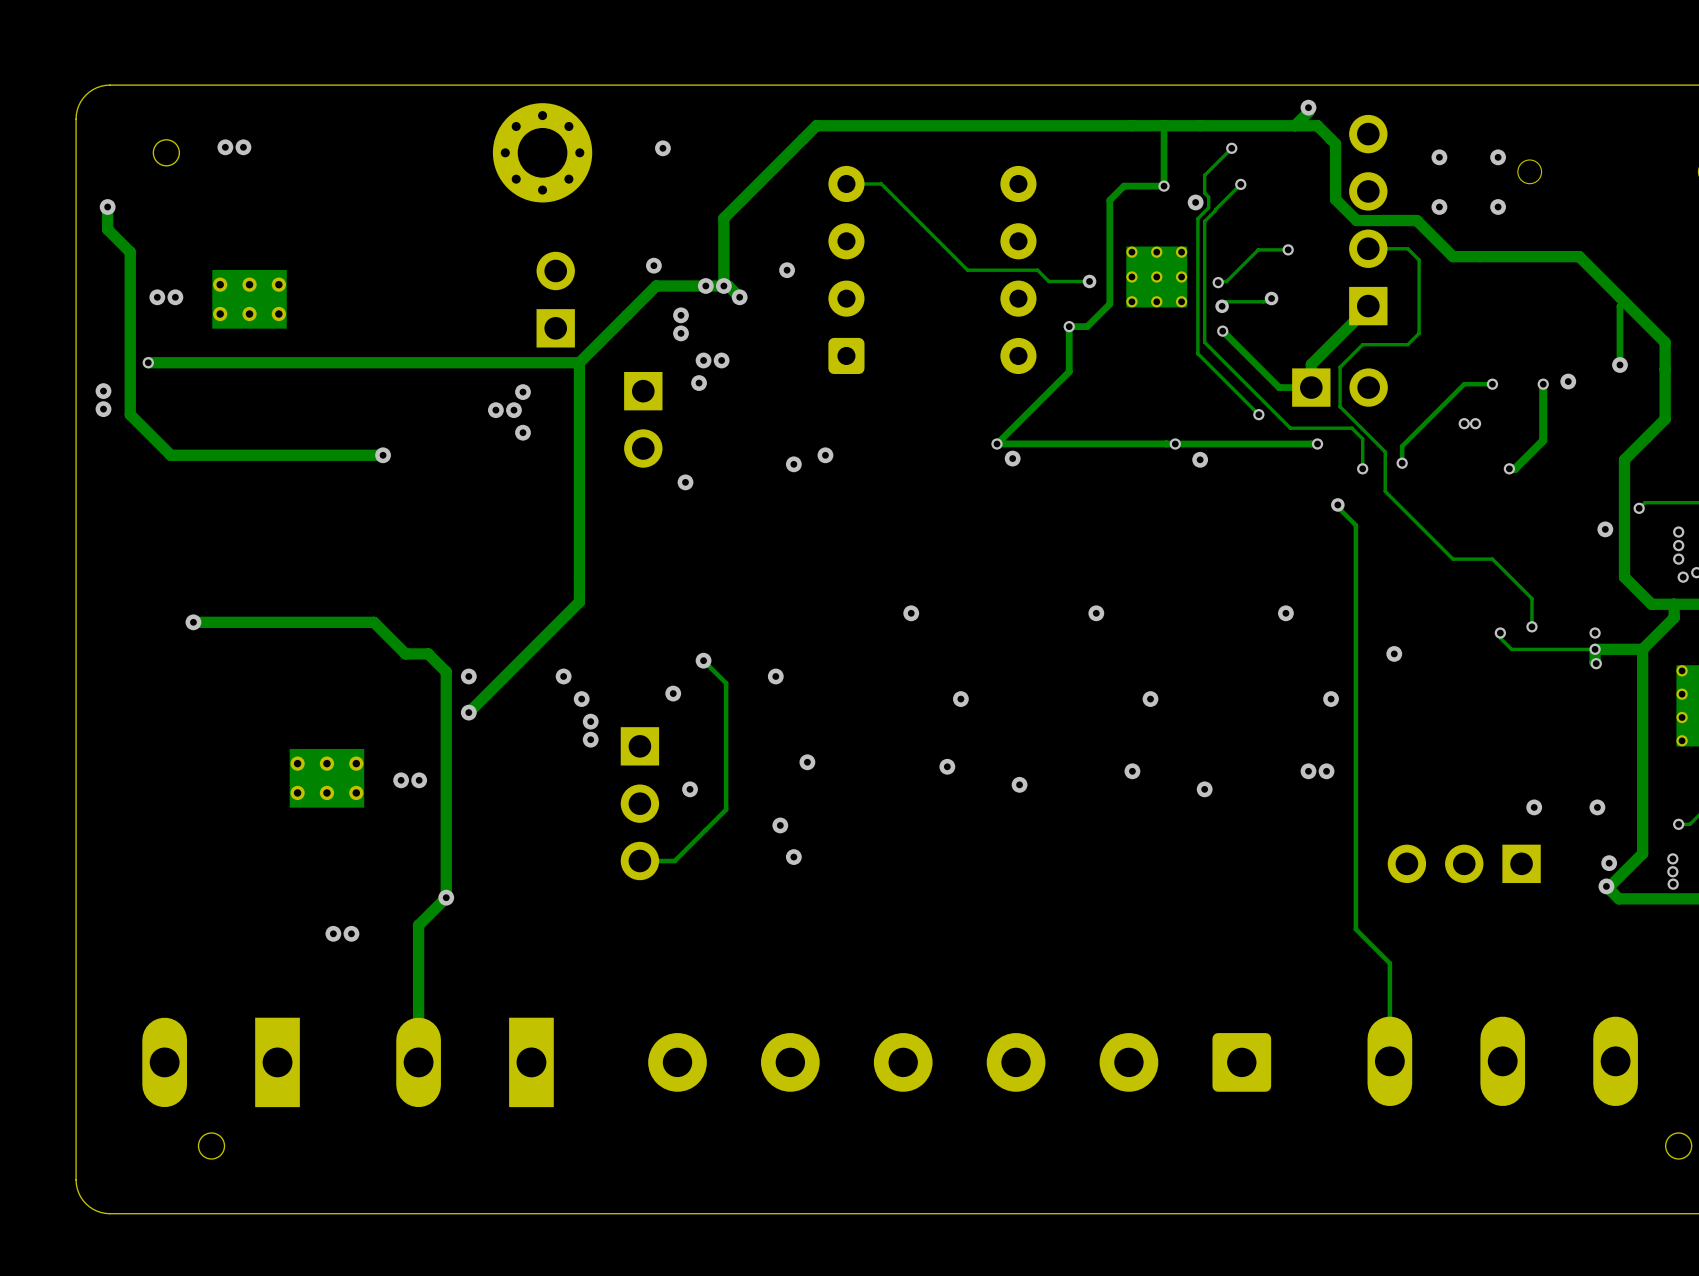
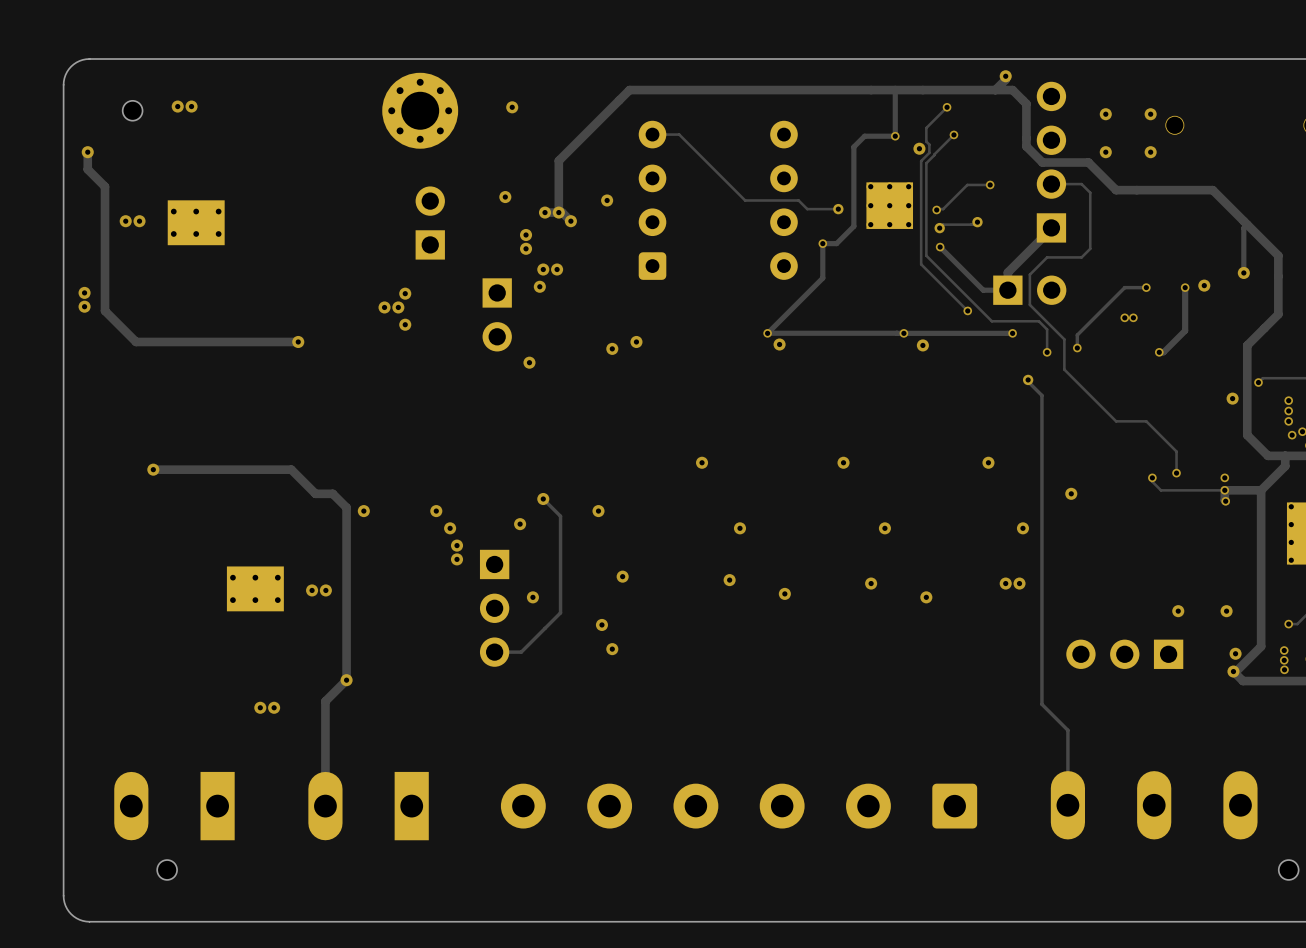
track: (705, 285) (656, 285) (579, 362) -> none
via: (148, 362) -> none
track: (579, 362) (579, 602) (468, 712) -> none
track: (579, 362) (148, 362) -> none
via: (468, 712) -> none

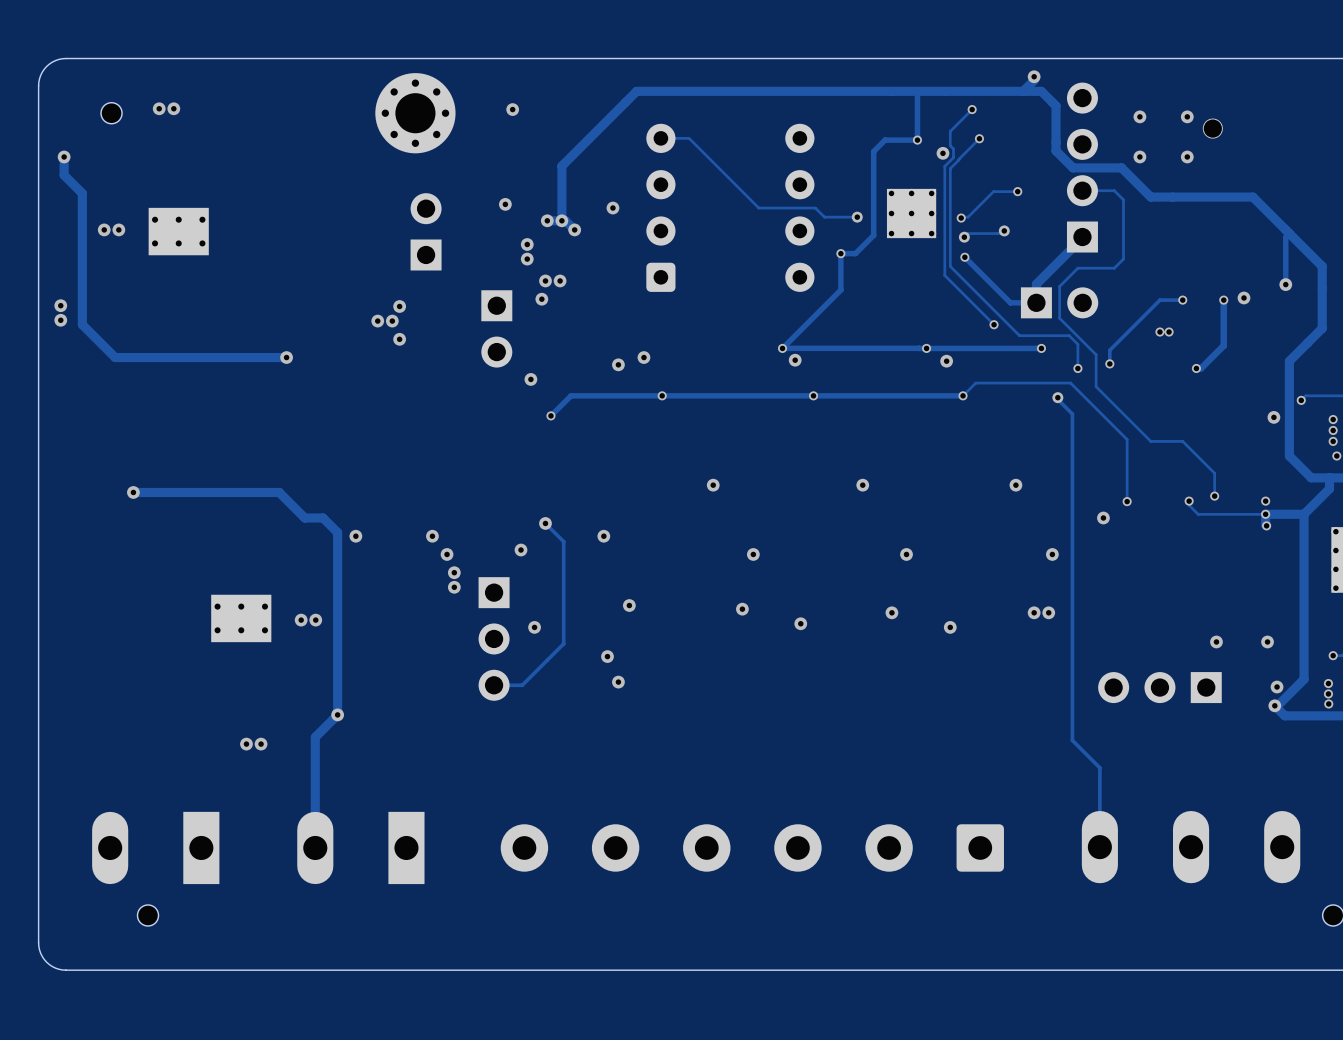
via: none -> (662, 395)
via: none -> (813, 395)
via: none -> (963, 395)
track: none -> (550, 415) (571, 395) (963, 395) (975, 383) (1070, 383) (1127, 439) (1127, 501)
via: none -> (550, 415)
via: none -> (1127, 501)

